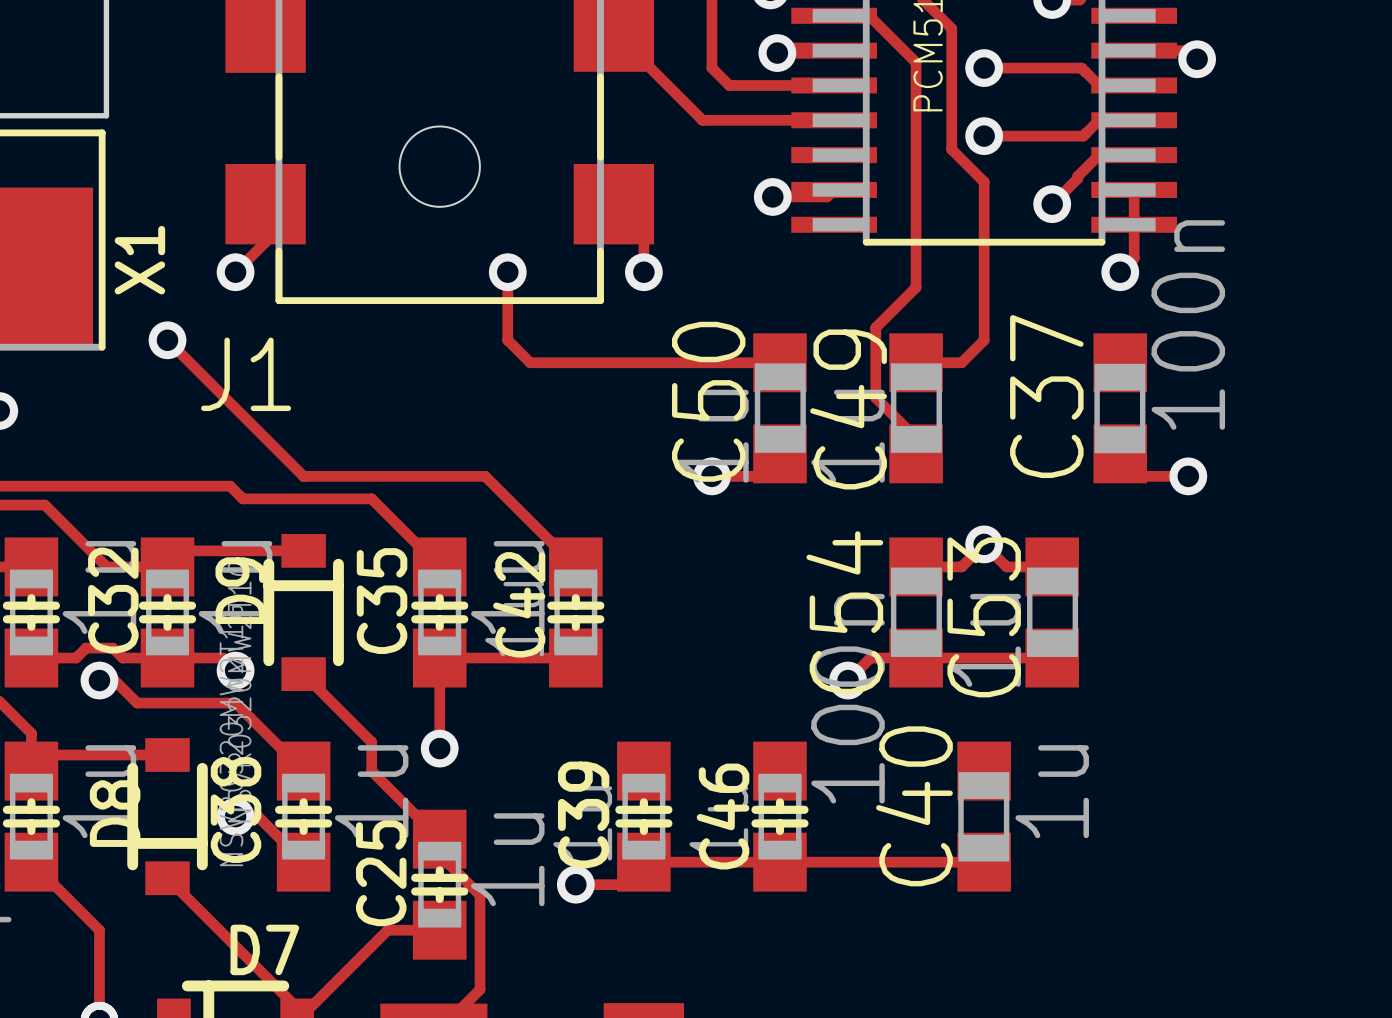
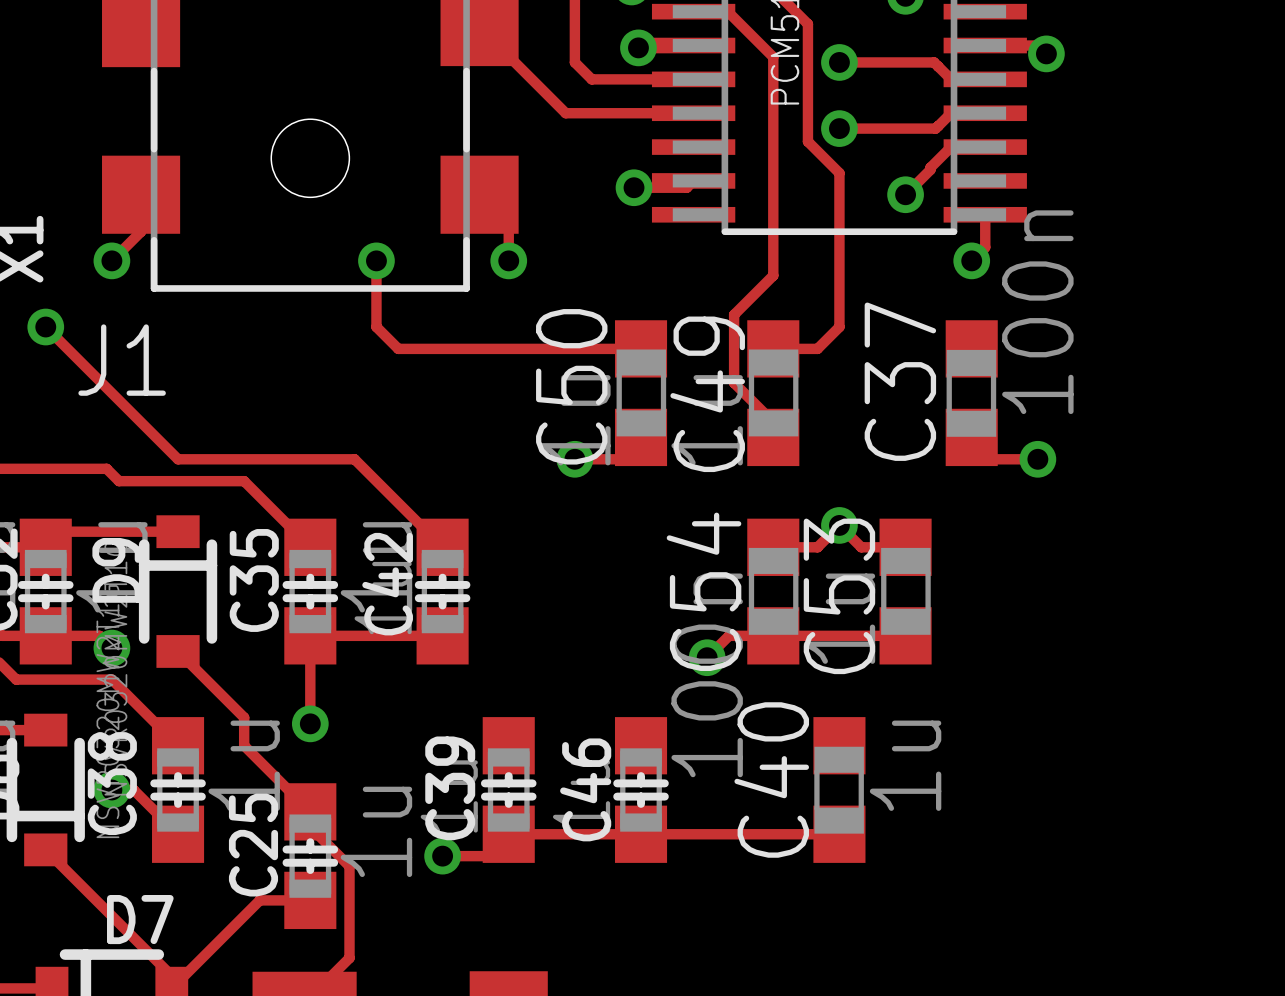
track: (1134, 189) (1134, 224) -> none

